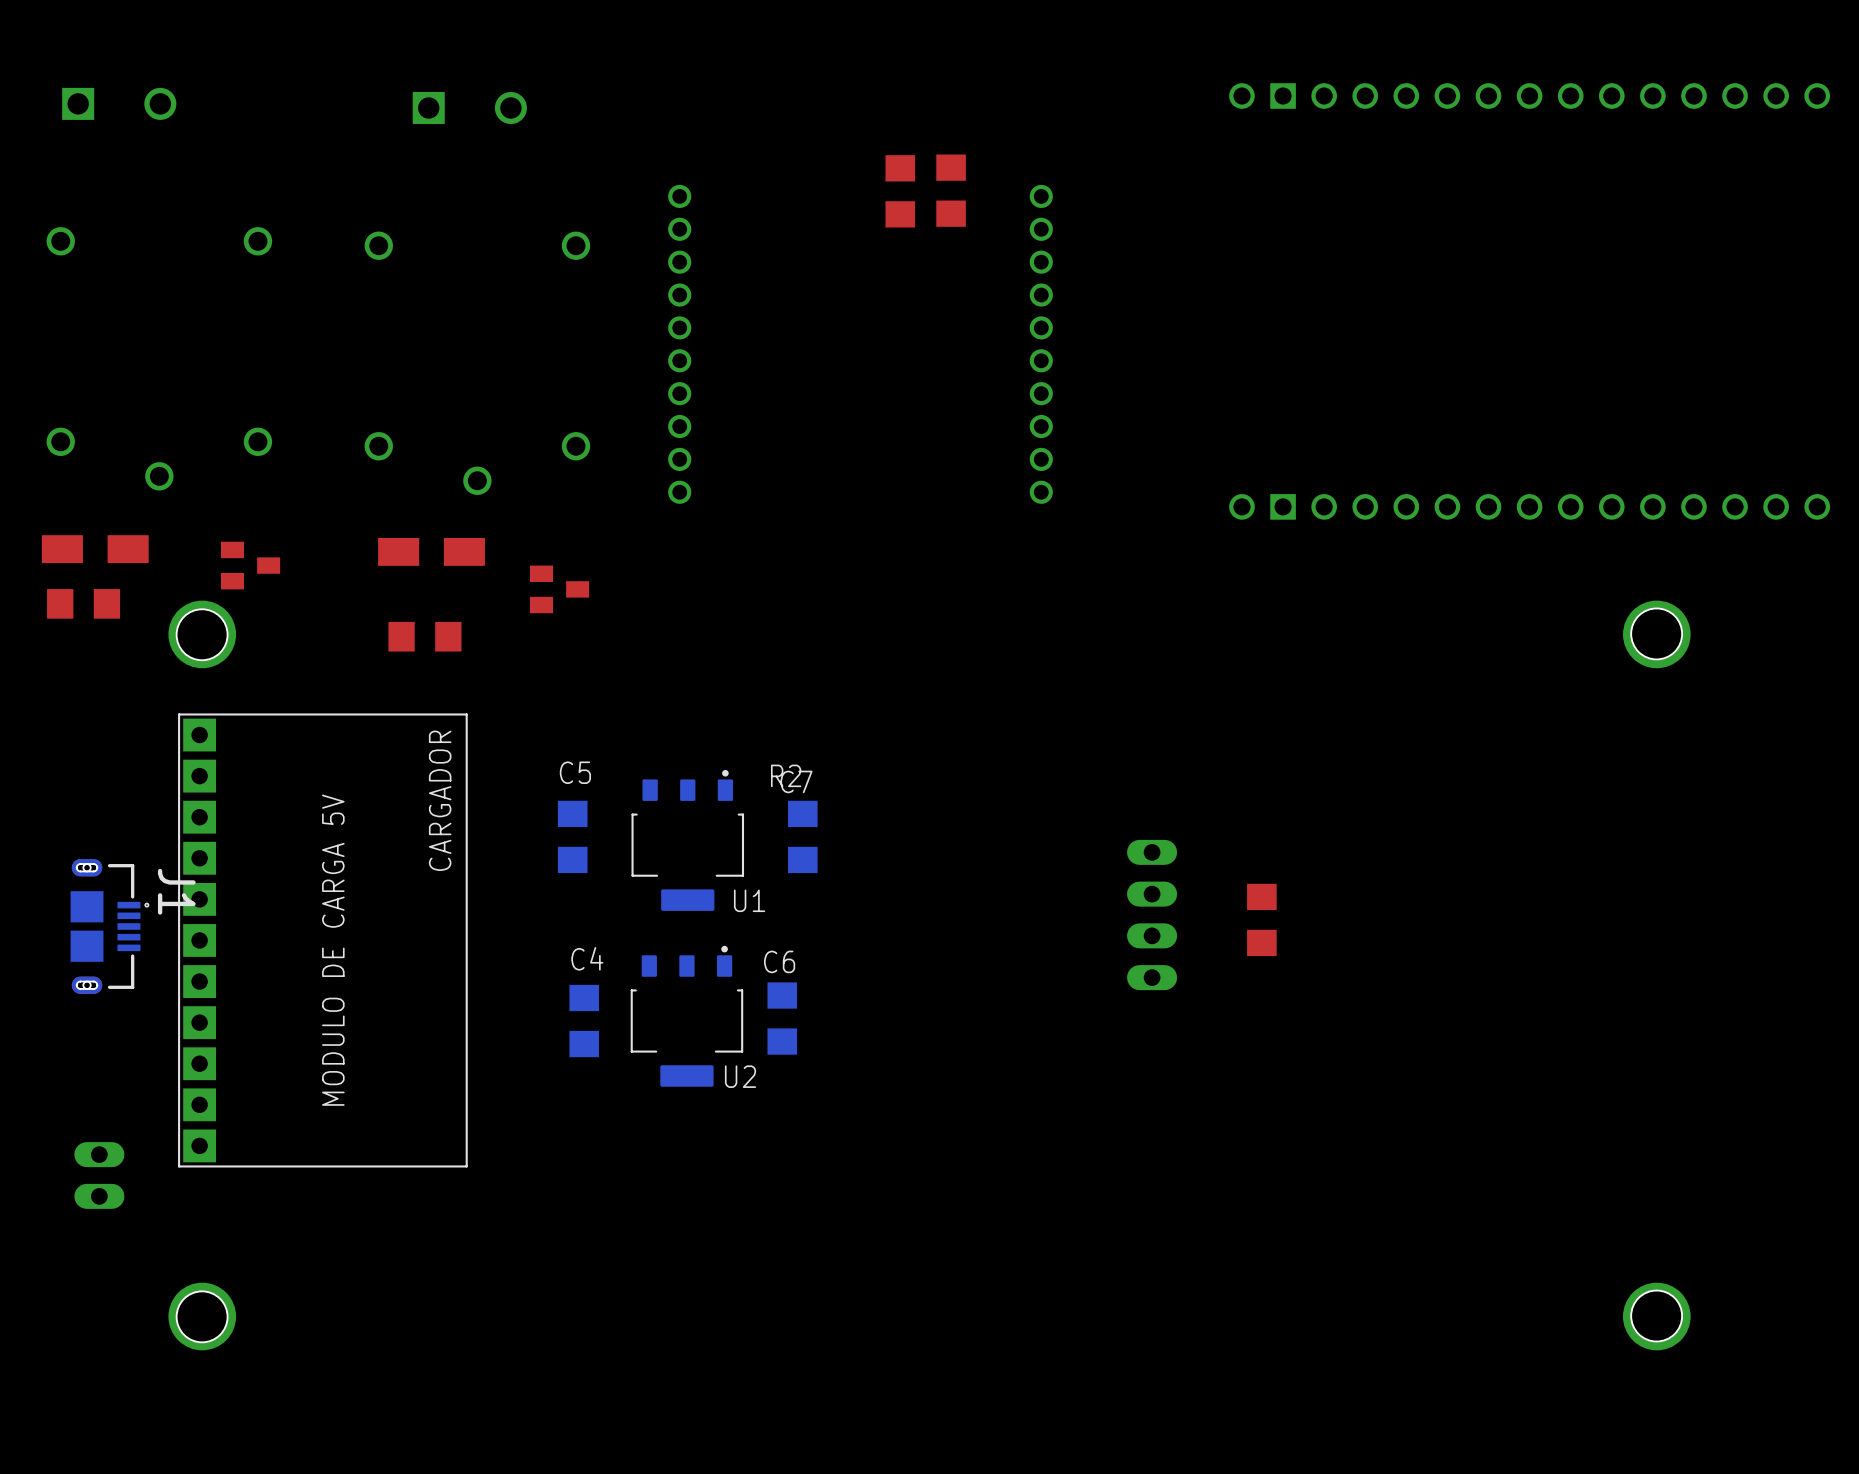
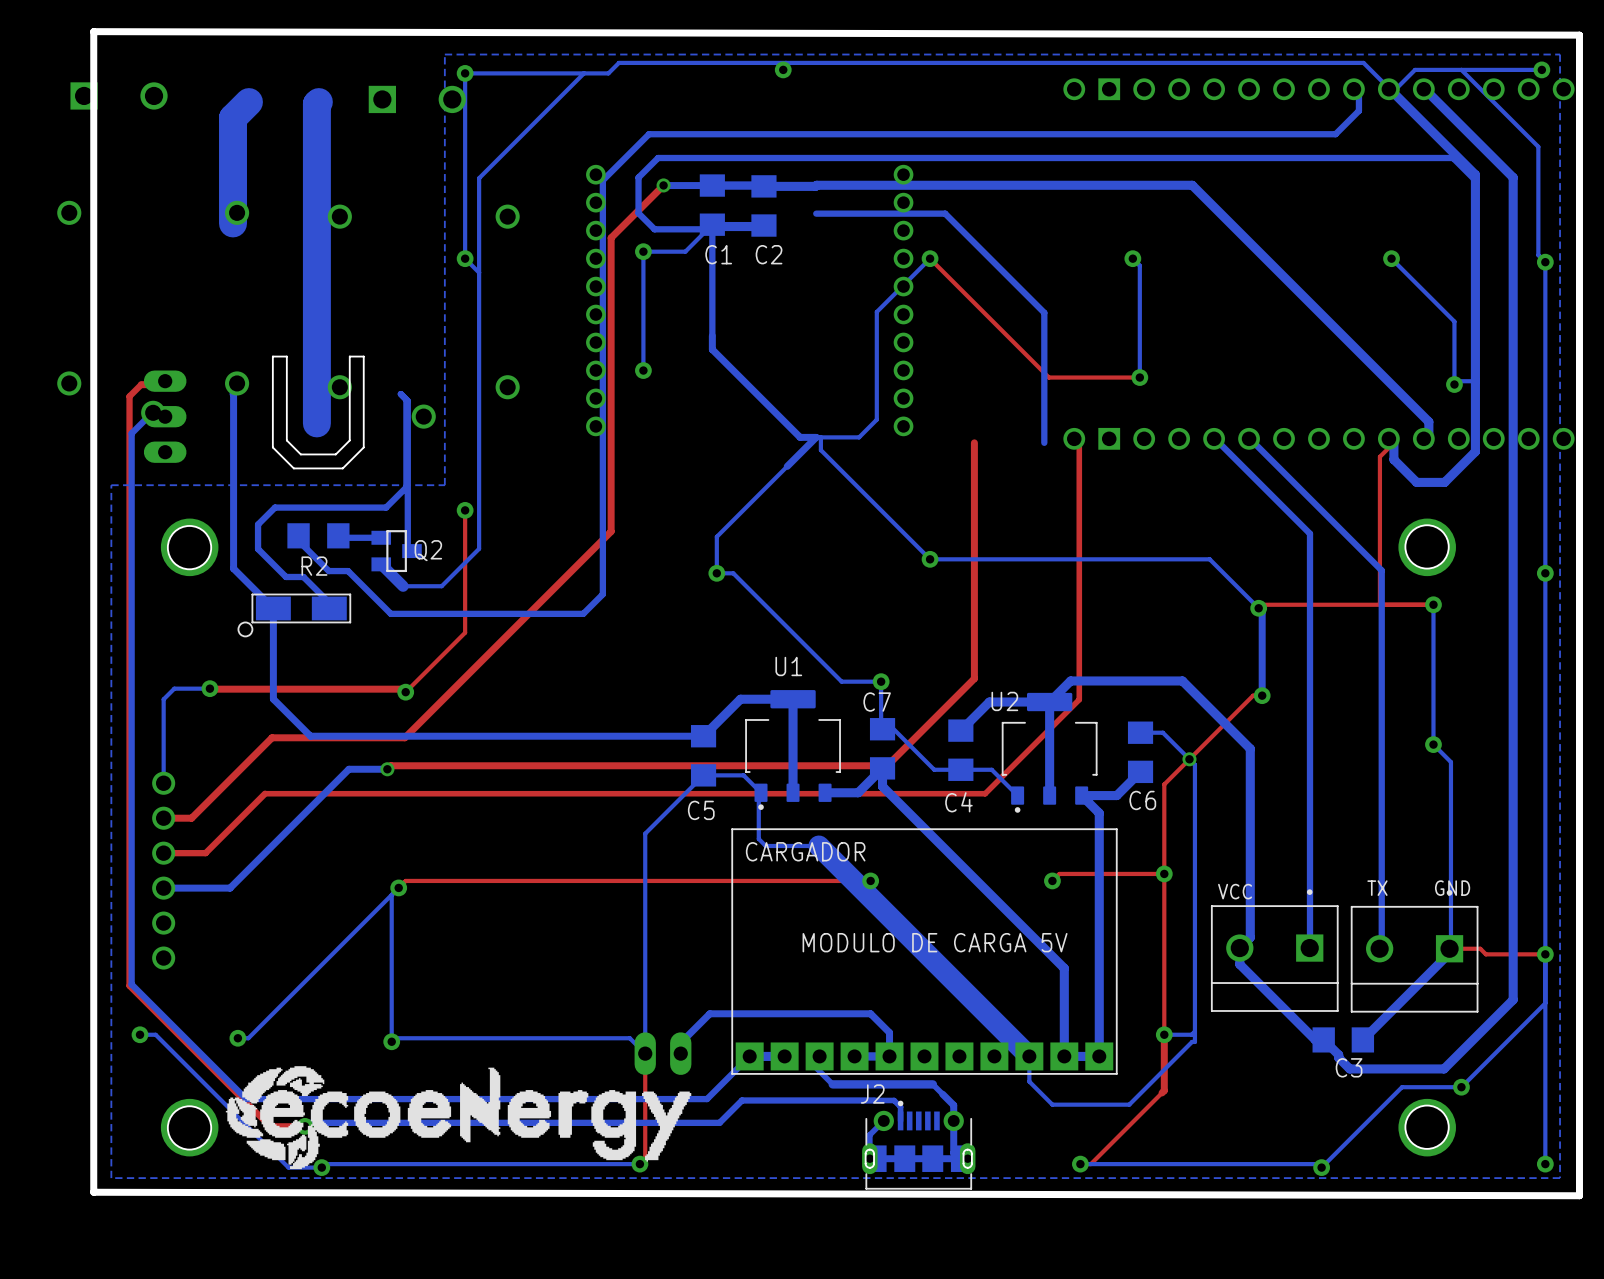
board edge: none -> (93, 31) (93, 1192) (1579, 1195) (1579, 35) (93, 31)
bottom zone outline: none -> (1560, 54) (444, 54) (444, 485) (111, 485) (111, 1178) (1560, 1178) (1560, 54)
via: none -> (783, 69)
bottom track: none -> (1461, 69) (1538, 146) (1538, 255) (1545, 262) (1545, 1164)
bottom track: none -> (1541, 69) (1415, 69) (1393, 93)
via: none -> (1541, 69)
via: none -> (465, 73)
bottom track: none -> (583, 73) (479, 178) (479, 548) (441, 586) (403, 586) (381, 564)
bottom track: none -> (1358, 93) (1358, 110) (1335, 134) (649, 134) (602, 180) (602, 594) (583, 613) (390, 613) (348, 571) (328, 571) (298, 540) (298, 535)
bottom track: none -> (1393, 93) (1475, 174) (1475, 451) (1444, 482) (1416, 482) (1393, 459) (1393, 442)
bottom track: none -> (1393, 93) (1363, 62) (618, 62) (608, 73) (465, 73) (465, 258) (479, 272)
bottom track: none -> (1428, 93) (1513, 177) (1513, 999) (1444, 1068) (1349, 1068) (1323, 1039) (1315, 1039) (1239, 964) (1239, 948) (1250, 937) (1250, 748) (1182, 680) (1070, 680) (1049, 702)
bottom track: none -> (248, 102) (233, 118) (233, 223)
bottom track: none -> (318, 102) (316, 104) (316, 423)
C1 side: top (951, 190) -> bottom (712, 205)
C2 side: top (900, 191) -> bottom (763, 205)
bottom track: none -> (1475, 180) (1453, 158) (658, 158) (638, 177) (638, 213) (654, 229) (712, 229)
bottom track: none -> (663, 185) (1192, 185) (1428, 421) (1428, 442)
top track: none -> (663, 185) (611, 237) (611, 531) (404, 737) (272, 737) (191, 818) (163, 818)
via: none -> (663, 185)
bottom track: none -> (816, 213) (945, 213) (1044, 312) (1044, 442)
bottom track: none -> (712, 224) (712, 349) (800, 437) (816, 437)
bottom track: none -> (712, 224) (714, 226) (763, 225)
bottom track: none -> (712, 224) (685, 251) (643, 251) (643, 370)
via: none -> (643, 251)
via: none -> (465, 258)
bottom track: none -> (930, 258) (876, 311) (876, 419) (859, 437) (816, 437)
top track: none -> (930, 258) (1048, 377) (1139, 377)
via: none -> (930, 258)
bottom track: none -> (1132, 258) (1139, 265) (1139, 377)
via: none -> (1132, 258)
bottom track: none -> (1391, 258) (1454, 321) (1454, 384) (1457, 381) (1475, 381)
via: none -> (1391, 258)
via: none -> (1545, 262)
board edge: none -> (363, 356) (349, 356) (349, 440) (335, 454) (300, 454) (286, 440) (286, 356) (272, 356) (272, 447) (293, 468) (342, 468) (363, 447) (363, 356)
via: none -> (643, 370)
via: none -> (1139, 377)
top track: none -> (165, 381) (161, 384) (141, 384) (129, 396) (129, 985) (270, 1126) (305, 1126)
via: none -> (1454, 384)
bottom track: none -> (233, 394) (233, 568) (273, 608) (273, 699) (310, 736) (703, 736) (740, 699) (793, 699) (793, 792)
bottom track: none -> (400, 394) (407, 401) (407, 546) (411, 551)
bottom track: none -> (406, 399) (406, 487) (386, 507) (275, 507) (258, 524) (258, 549) (286, 576) (303, 576) (329, 602) (329, 608)
bottom track: none -> (165, 416) (148, 416) (131, 433) (131, 984) (246, 1099) (707, 1099) (749, 1056) (784, 1056)
part: none -> (165, 416)
bottom track: none -> (816, 437) (716, 536) (716, 573) (733, 573) (841, 681) (881, 681) (881, 727) (891, 727) (934, 769) (991, 769) (1017, 795)
bottom track: none -> (820, 437) (820, 450) (930, 559) (1209, 559) (1262, 611) (1262, 695)
top track: none -> (974, 442) (974, 678) (887, 765) (390, 765) (387, 769)
top track: none -> (1079, 442) (1079, 699) (985, 793) (265, 793) (205, 853) (163, 853)
bottom track: none -> (1219, 442) (1310, 533) (1309, 948)
bottom track: none -> (1254, 442) (1381, 570) (1381, 946) (1379, 948)
top track: none -> (1393, 442) (1379, 456) (1381, 604)
part: (95, 549) -> none
part side: top (431, 551) -> bottom (294, 615)
part: (250, 565) -> none
Q2 side: top (559, 589) -> bottom (396, 551)
top track: none -> (465, 510) (465, 632) (405, 692)
via: none -> (465, 510)
part: (83, 603) -> none
bottom track: none -> (338, 535) (340, 537) (381, 537)
R2 side: top (424, 636) -> bottom (318, 535)
via: none -> (930, 559)
via: none -> (716, 573)
via: none -> (1545, 573)
bottom track: none -> (1433, 604) (1433, 744) (1450, 762) (1450, 950) (1449, 948) (1449, 953) (1362, 1039)
top track: none -> (1433, 604) (1262, 604) (1258, 608)
via: none -> (1433, 604)
via: none -> (1258, 608)
C5 name position: C5 (575, 772) -> C5 (701, 810)
via: none -> (881, 681)
bottom track: none -> (209, 688) (174, 688) (163, 699) (163, 783)
top track: none -> (209, 688) (408, 689)
via: none -> (209, 688)
via: none -> (405, 692)
top track: none -> (1262, 695) (1253, 695) (1164, 784) (1164, 1090) (1090, 1164) (1080, 1164)
via: none -> (1262, 695)
bottom track: none -> (1049, 702) (1049, 795)
bottom track: none -> (1049, 702) (989, 702) (960, 730)
C5 position: (572, 836) -> (703, 755)
C7 position: (802, 836) -> (882, 748)
U1 rotation: 0° (687, 840) -> 180° (793, 750)
U1 position: (687, 840) -> (793, 750)
bottom track: none -> (1140, 732) (1162, 732) (1194, 764) (1194, 1041) (1192, 1041) (1129, 1104) (1052, 1104) (1029, 1081) (1029, 1056) (818, 845) (765, 845) (758, 838) (758, 795) (761, 792) (743, 775) (703, 775) (645, 833) (645, 1053) (629, 1038) (395, 1038) (391, 1041) (391, 894)
via: none -> (1433, 744)
via: none -> (1189, 759)
bottom track: none -> (387, 769) (348, 769) (230, 888) (163, 888)
via: none -> (387, 769)
bottom track: none -> (1140, 771) (1116, 795) (1081, 795) (1099, 813) (1099, 1056) (1064, 1056) (1064, 968) (882, 786) (882, 768) (858, 792) (825, 792)
U1 name position: U1 (749, 900) -> U1 (788, 666)
part: (1152, 914) -> none
part: (1261, 919) -> none
J1: (109, 926) -> none
CARGADOR: (322, 940) -> none
C4 name position: C4 (587, 958) -> C4 (958, 802)
C6 name position: C6 (779, 961) -> C6 (1142, 800)
part: none -> (163, 870)
U2 rotation: 0° (686, 1016) -> 180° (1049, 752)
U2 position: (686, 1016) -> (1049, 752)
C6 position: (782, 1018) -> (1140, 752)
top track: none -> (1164, 873) (1059, 873) (1052, 880)
via: none -> (1164, 873)
C4 position: (584, 1021) -> (960, 750)
top track: none -> (870, 880) (405, 880) (398, 887)
via: none -> (870, 880)
via: none -> (1052, 880)
bottom track: none -> (398, 887) (248, 1038) (237, 1038)
via: none -> (398, 887)
text: none -> TX (1377, 888)
text: none -> GND (1452, 888)
text: none -> VCC (1235, 891)
top track: none -> (1449, 948) (1480, 948) (1485, 954) (1545, 954)
part: none -> (1274, 950)
CARGADOR: none -> (924, 951)
part: none -> (1414, 951)
via: none -> (1545, 954)
bottom track: none -> (1545, 1003) (1461, 1087) (1402, 1087) (1321, 1167) (1318, 1164) (1080, 1164)
part: (99, 1175) -> none
bottom track: none -> (1194, 1031) (1191, 1034) (1164, 1034)
bottom track: none -> (140, 1034) (155, 1034) (288, 1167) (321, 1167) (325, 1164) (639, 1164)
via: none -> (140, 1034)
via: none -> (1164, 1034)
via: none -> (237, 1038)
C3: none -> (1343, 1039)
via: none -> (391, 1041)
top track: none -> (645, 1053) (645, 1158) (639, 1164)
part: none -> (662, 1053)
bottom track: none -> (680, 1053) (681, 1041) (709, 1013) (870, 1013) (889, 1032) (889, 1056) (854, 1056)
bottom track: none -> (819, 1056) (816, 1059) (816, 1067) (832, 1084) (932, 1084) (953, 1105) (953, 1153) (959, 1158) (878, 1158)
drawing: none -> [225, 1066, 692, 1170]
via: none -> (1461, 1087)
bottom track: none -> (883, 1120) (869, 1134) (869, 1158)
bottom track: none -> (900, 1120) (900, 1106) (894, 1100) (742, 1100) (719, 1122) (308, 1122) (305, 1126)
via: none -> (305, 1126)
J2: none -> (918, 1145)
via: none -> (639, 1164)
via: none -> (1080, 1164)
via: none -> (1545, 1164)
via: none -> (321, 1167)
via: none -> (1321, 1167)

